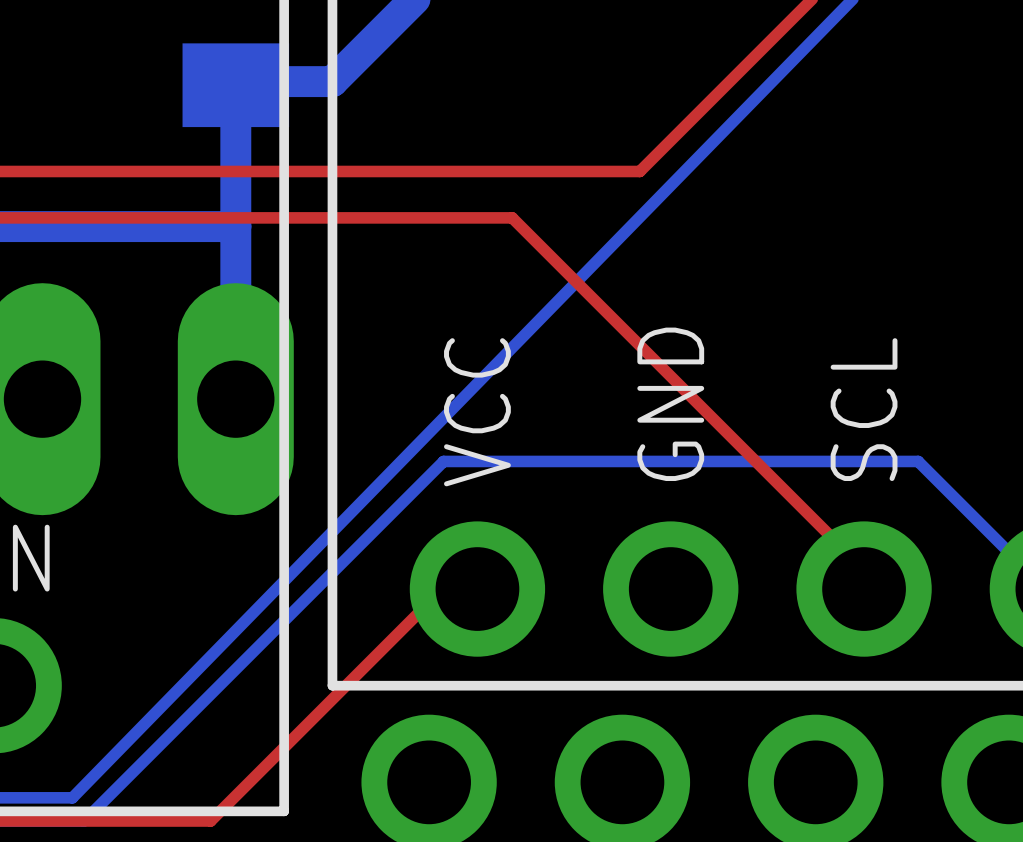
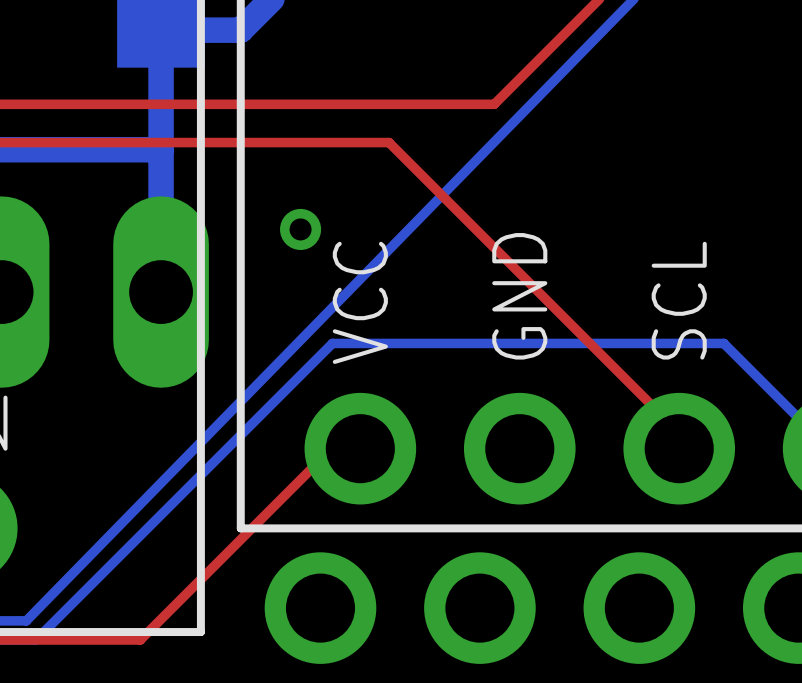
via: none -> (300, 229)

